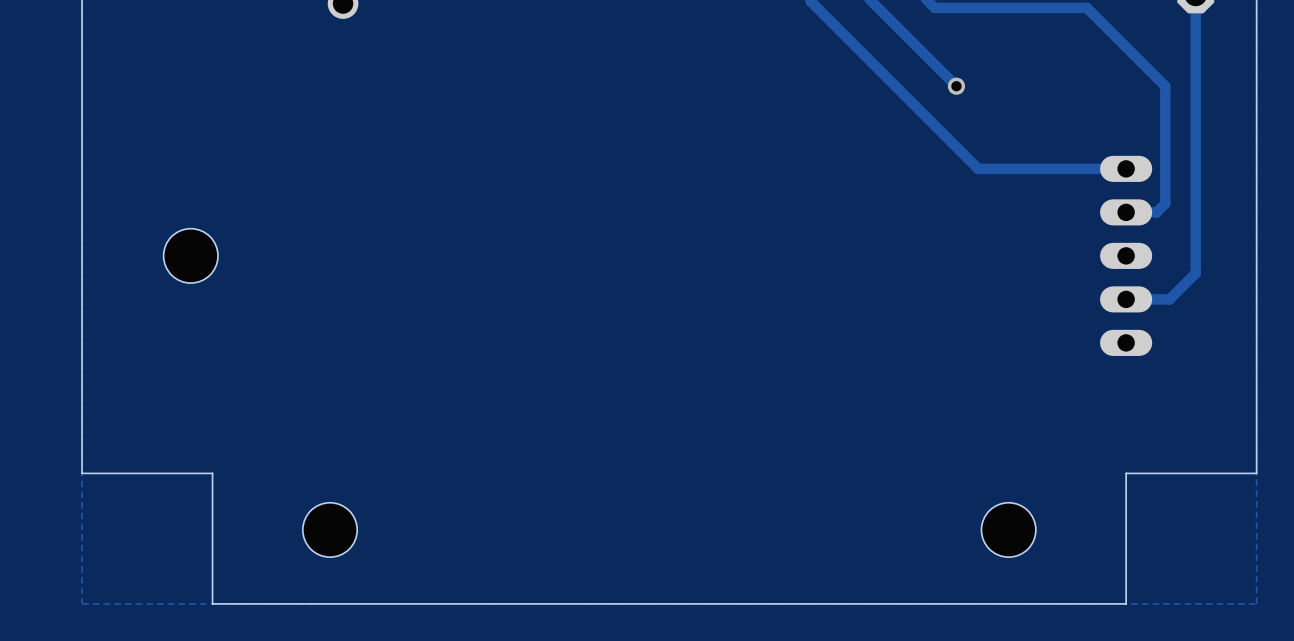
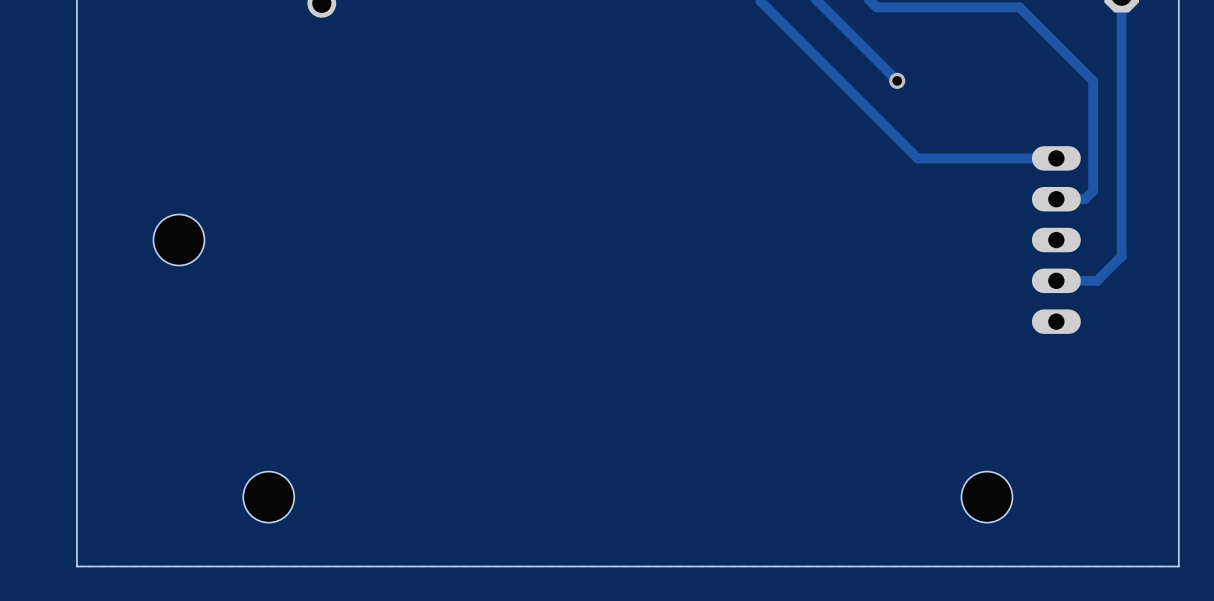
board edge: (82, 473) (212, 473) (212, 603) -> (76, 444) (76, 566) (199, 566)
board edge: (1256, 473) (1126, 473) (1126, 603) -> (1178, 444) (1178, 566) (1056, 566)
part position: (330, 529) -> (268, 497)
part position: (1008, 529) -> (986, 497)

